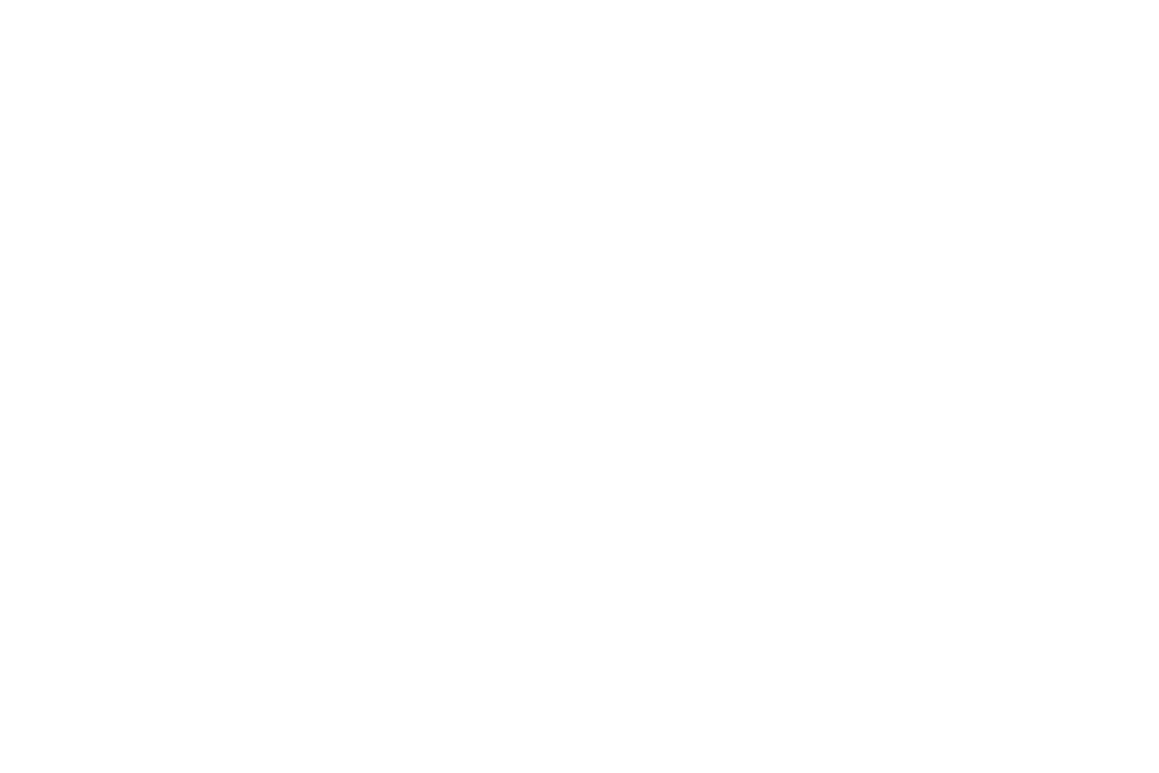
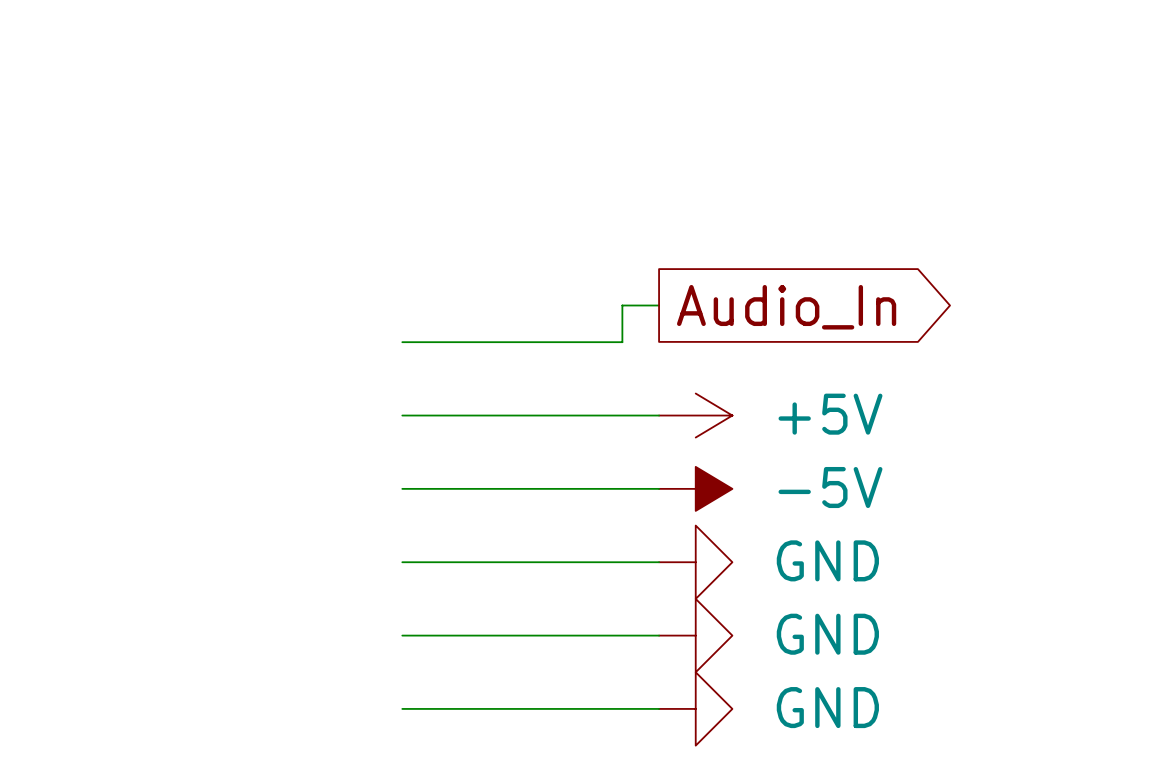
wire: none -> (659, 305) (622, 305) (622, 342) (402, 342)
global label: none -> Audio_In (786, 307)
wire: none -> (402, 415) (659, 415)
power symbol: none -> +5V (695, 415)
wire: none -> (402, 488) (659, 488)
power symbol: none -> -5V (695, 488)
wire: none -> (402, 562) (659, 562)
power symbol: none -> GND (695, 562)
wire: none -> (402, 635) (659, 635)
power symbol: none -> GND (695, 635)
wire: none -> (402, 708) (659, 708)
power symbol: none -> GND (695, 708)

